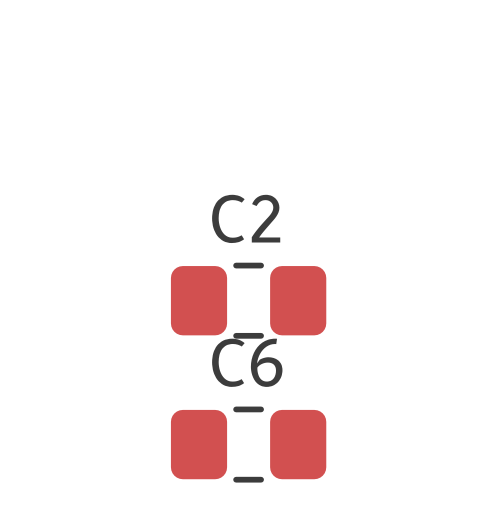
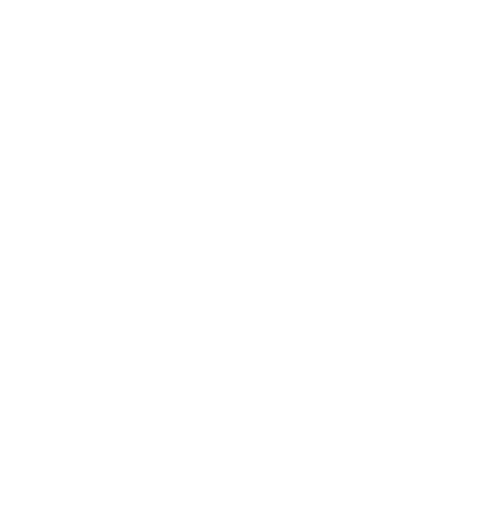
C2: (248, 300) -> none
C6: (248, 444) -> none

